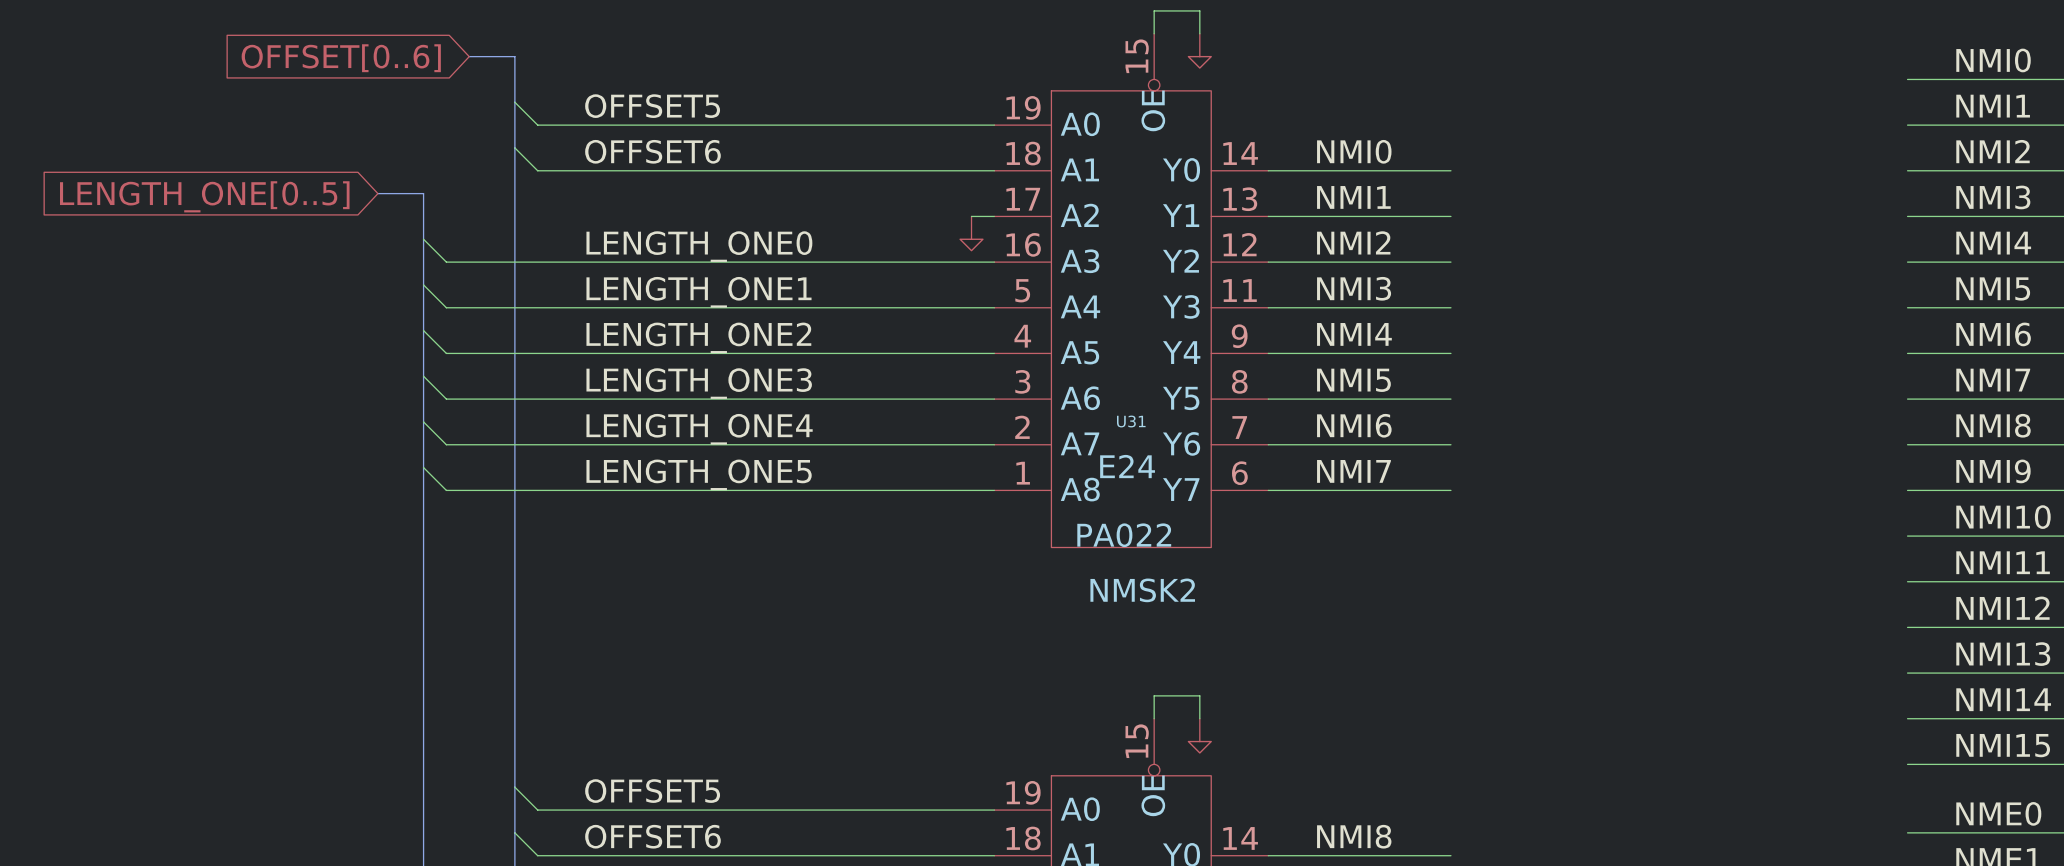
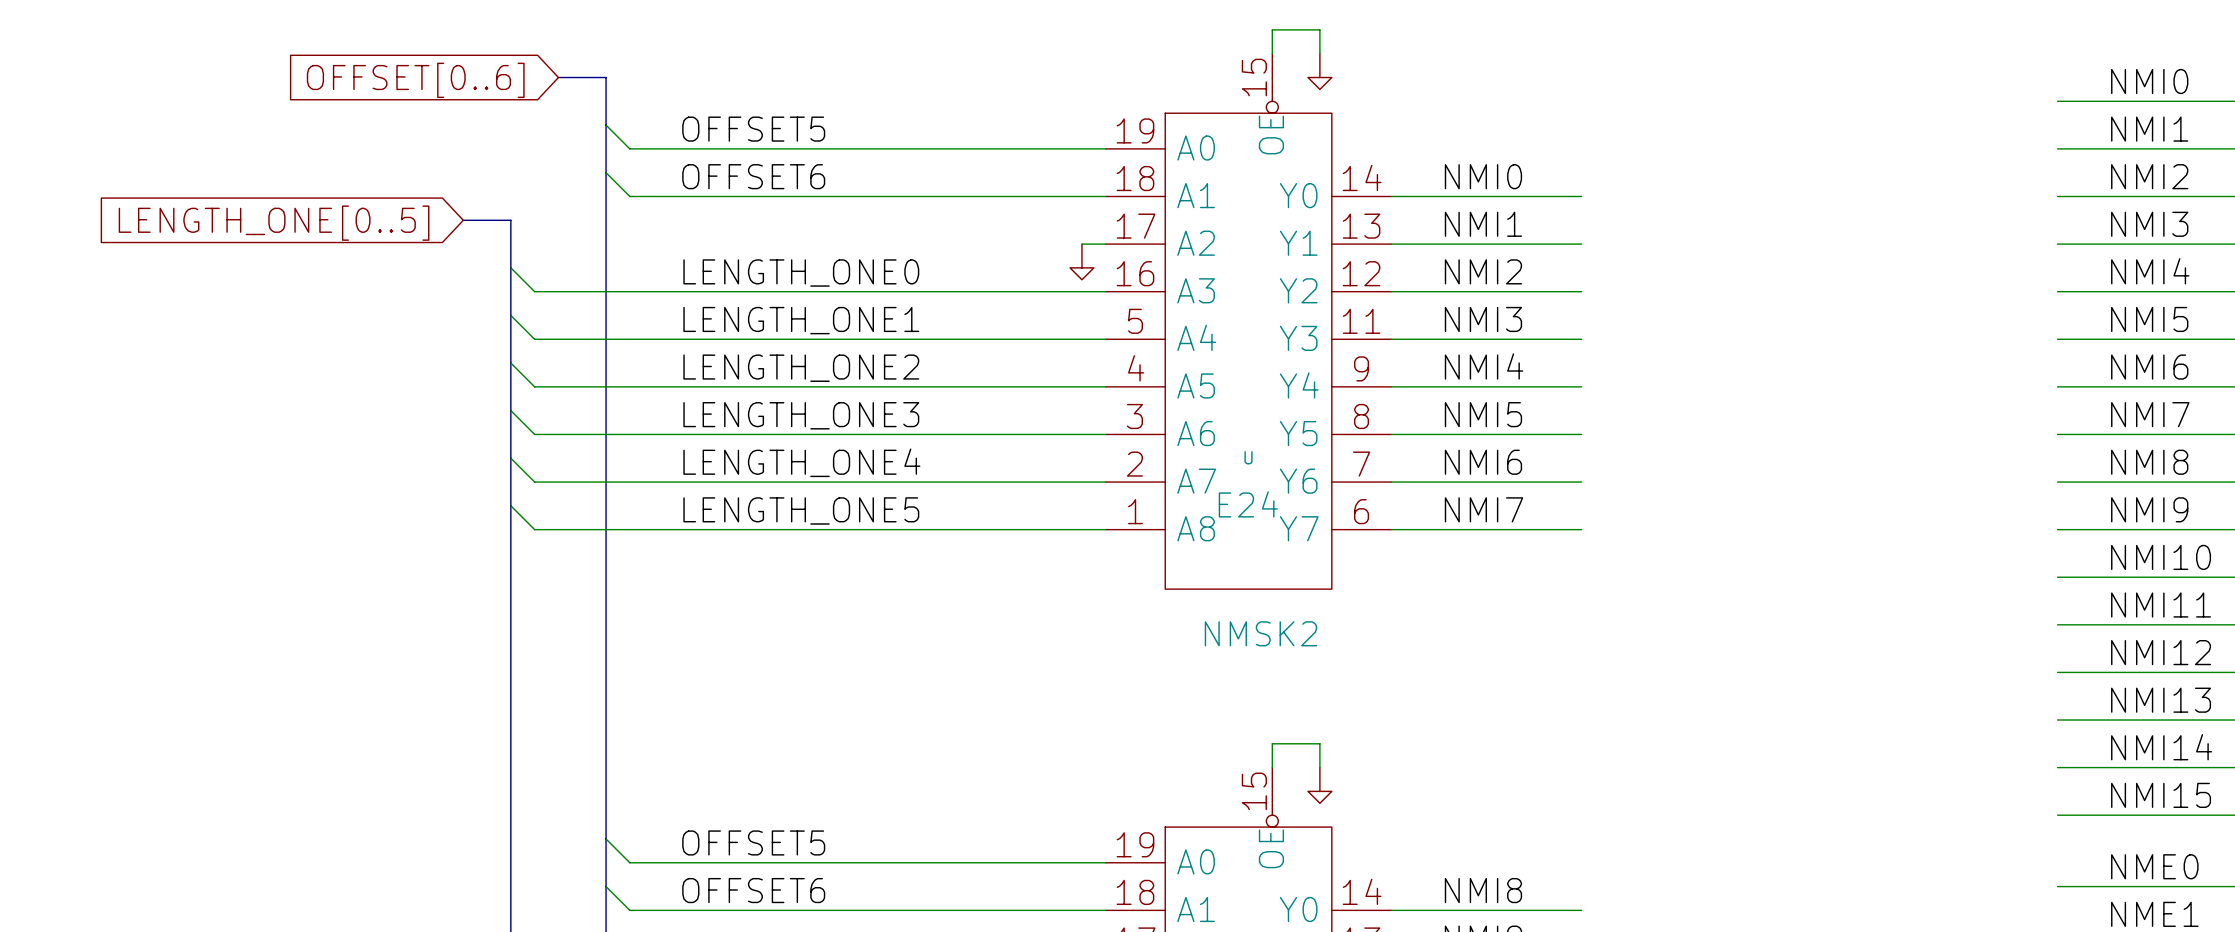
U31 name: U31 (1131, 421) -> U (1248, 457)
U31 value: PA022 (1124, 535) -> none

